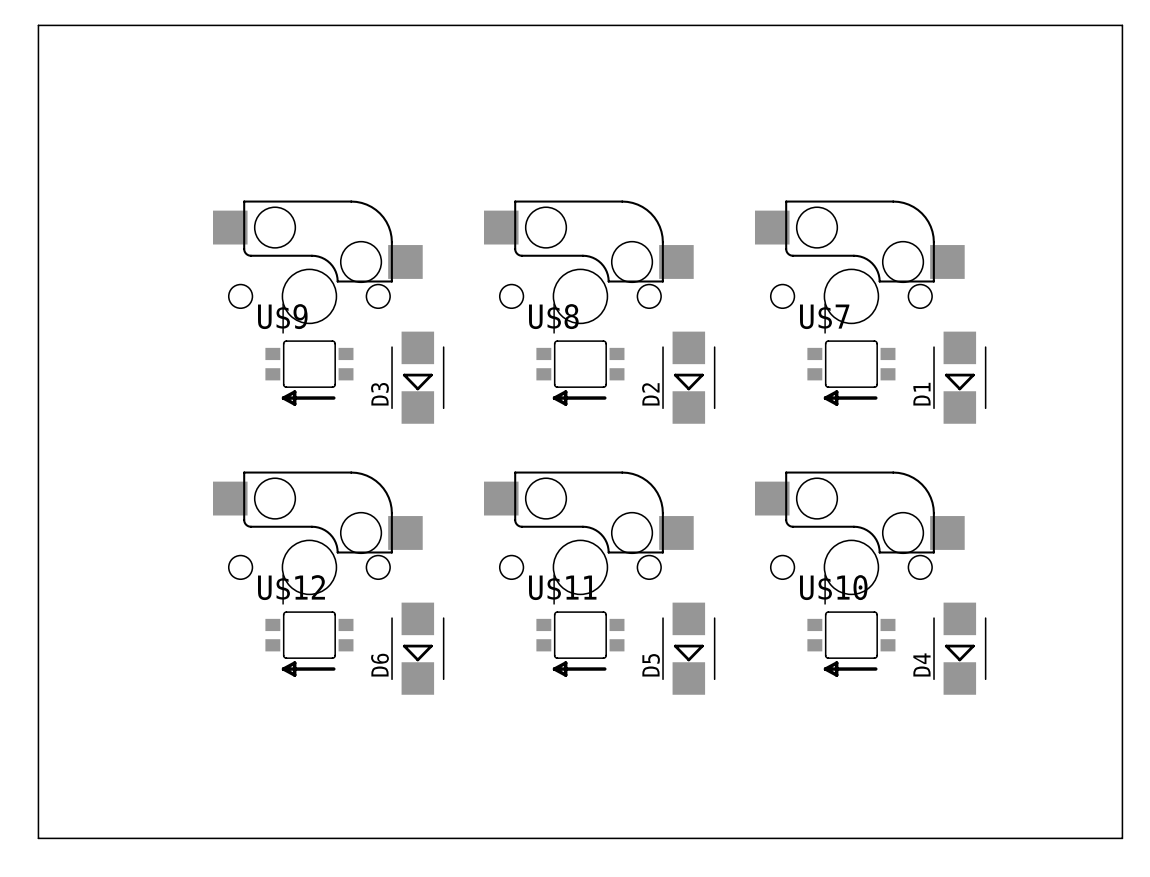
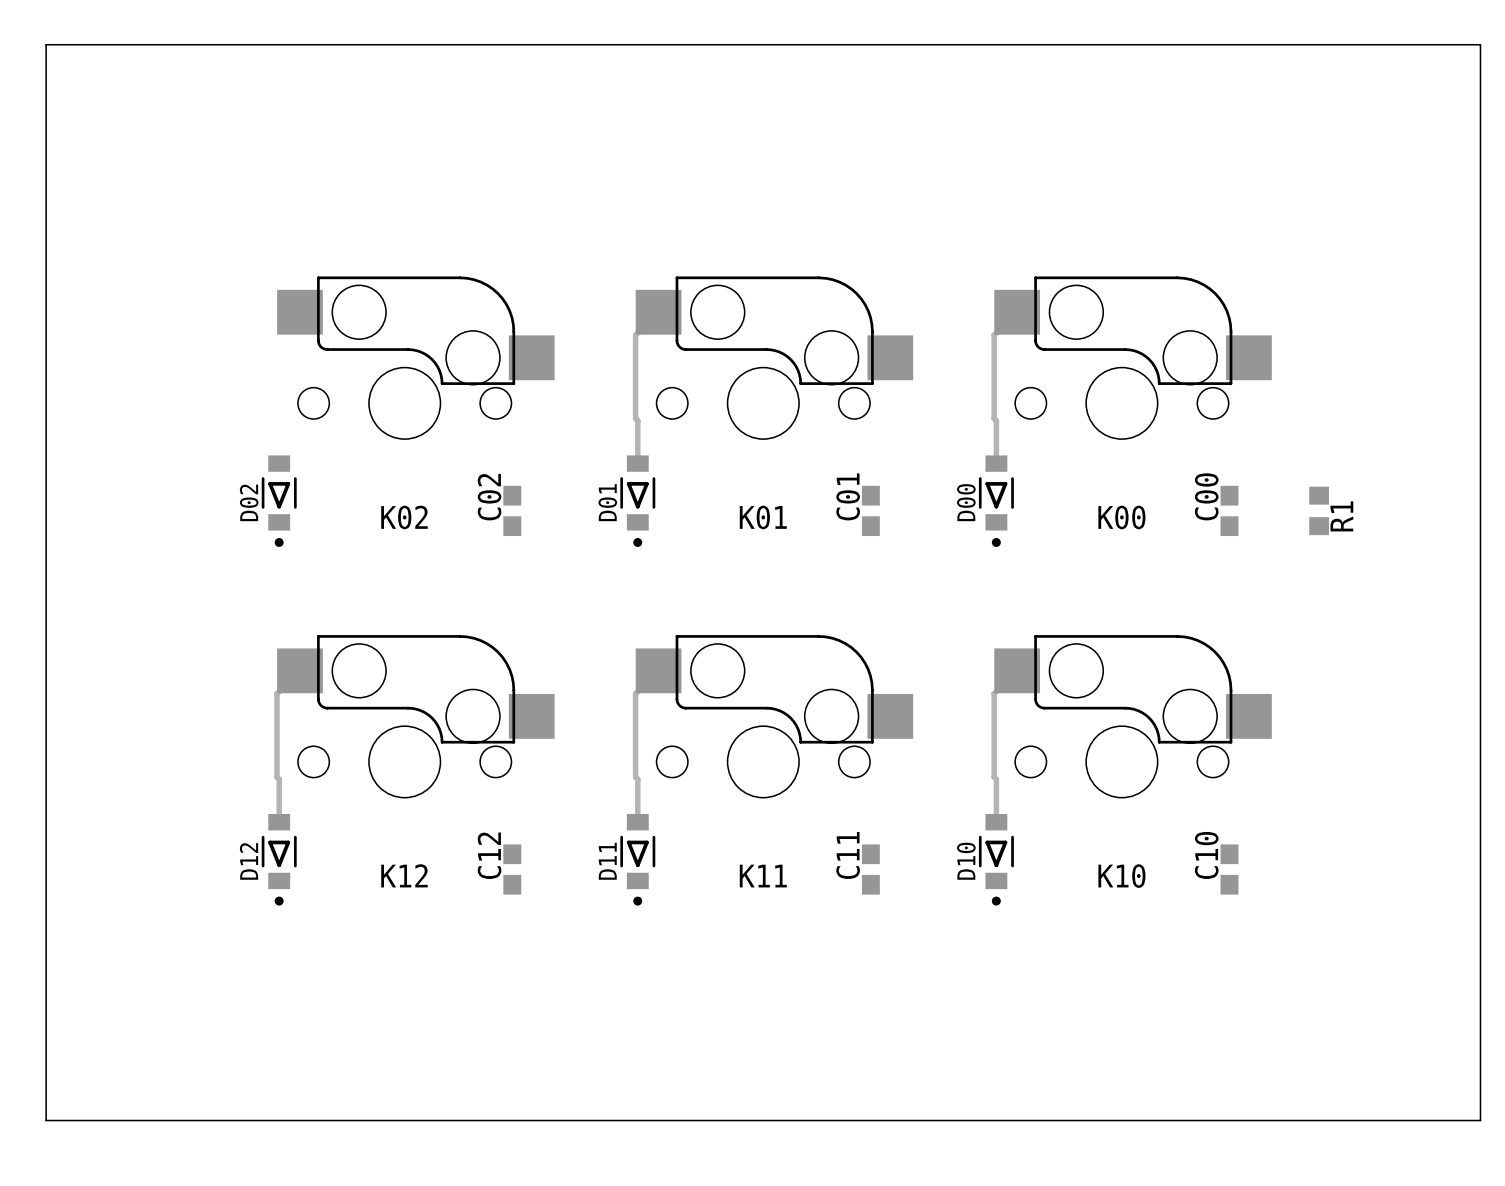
track: none -> (658, 312) (635, 335) (637, 463)
track: none -> (1017, 312) (994, 335) (996, 463)
D02: none -> (279, 501)
D01: none -> (637, 501)
D00: none -> (996, 501)
U$9: (309, 373) -> none
U$8: (580, 373) -> none
U$7: (851, 373) -> none
C02: none -> (512, 510)
D3: (417, 377) -> none
C01: none -> (870, 510)
D2: (688, 377) -> none
C00: none -> (1229, 510)
D1: (959, 377) -> none
R1: none -> (1319, 510)
K02 name: none -> K02 (404, 517)
K01 name: none -> K01 (763, 517)
K00 name: none -> K00 (1121, 517)
track: none -> (299, 670) (277, 693) (279, 822)
track: none -> (658, 670) (635, 693) (637, 822)
track: none -> (1017, 670) (994, 693) (996, 822)
D12: none -> (279, 859)
D11: none -> (637, 859)
D10: none -> (996, 859)
U$12: (309, 644) -> none
U$11: (580, 644) -> none
U$10: (851, 644) -> none
C12: none -> (512, 869)
D6: (417, 648) -> none
C11: none -> (870, 869)
D5: (688, 648) -> none
C10: none -> (1229, 869)
D4: (959, 648) -> none
K12 name: none -> K12 (404, 875)
K11 name: none -> K11 (763, 876)
K10 name: none -> K10 (1121, 876)

